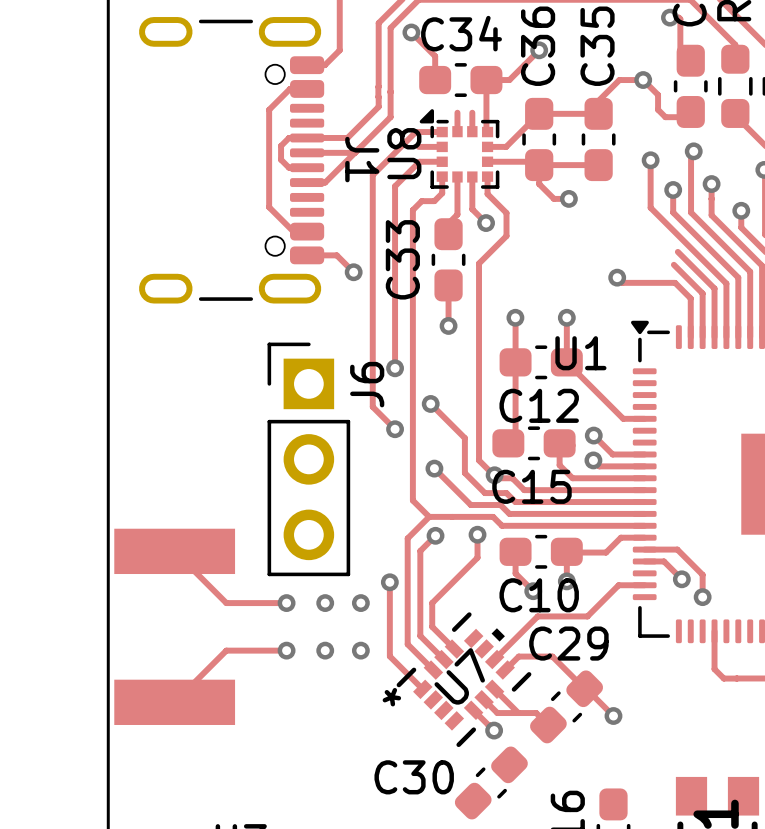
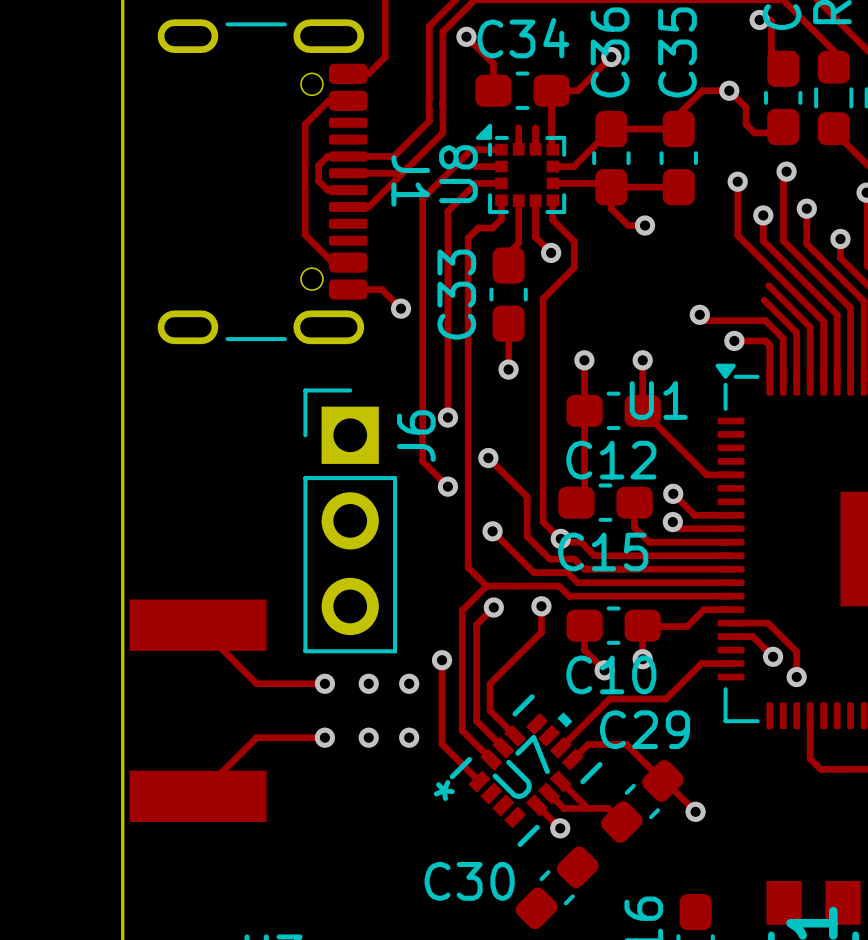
track: none -> (734, 340) (765, 340) (769, 345) (769, 382)
via: none -> (734, 340)

